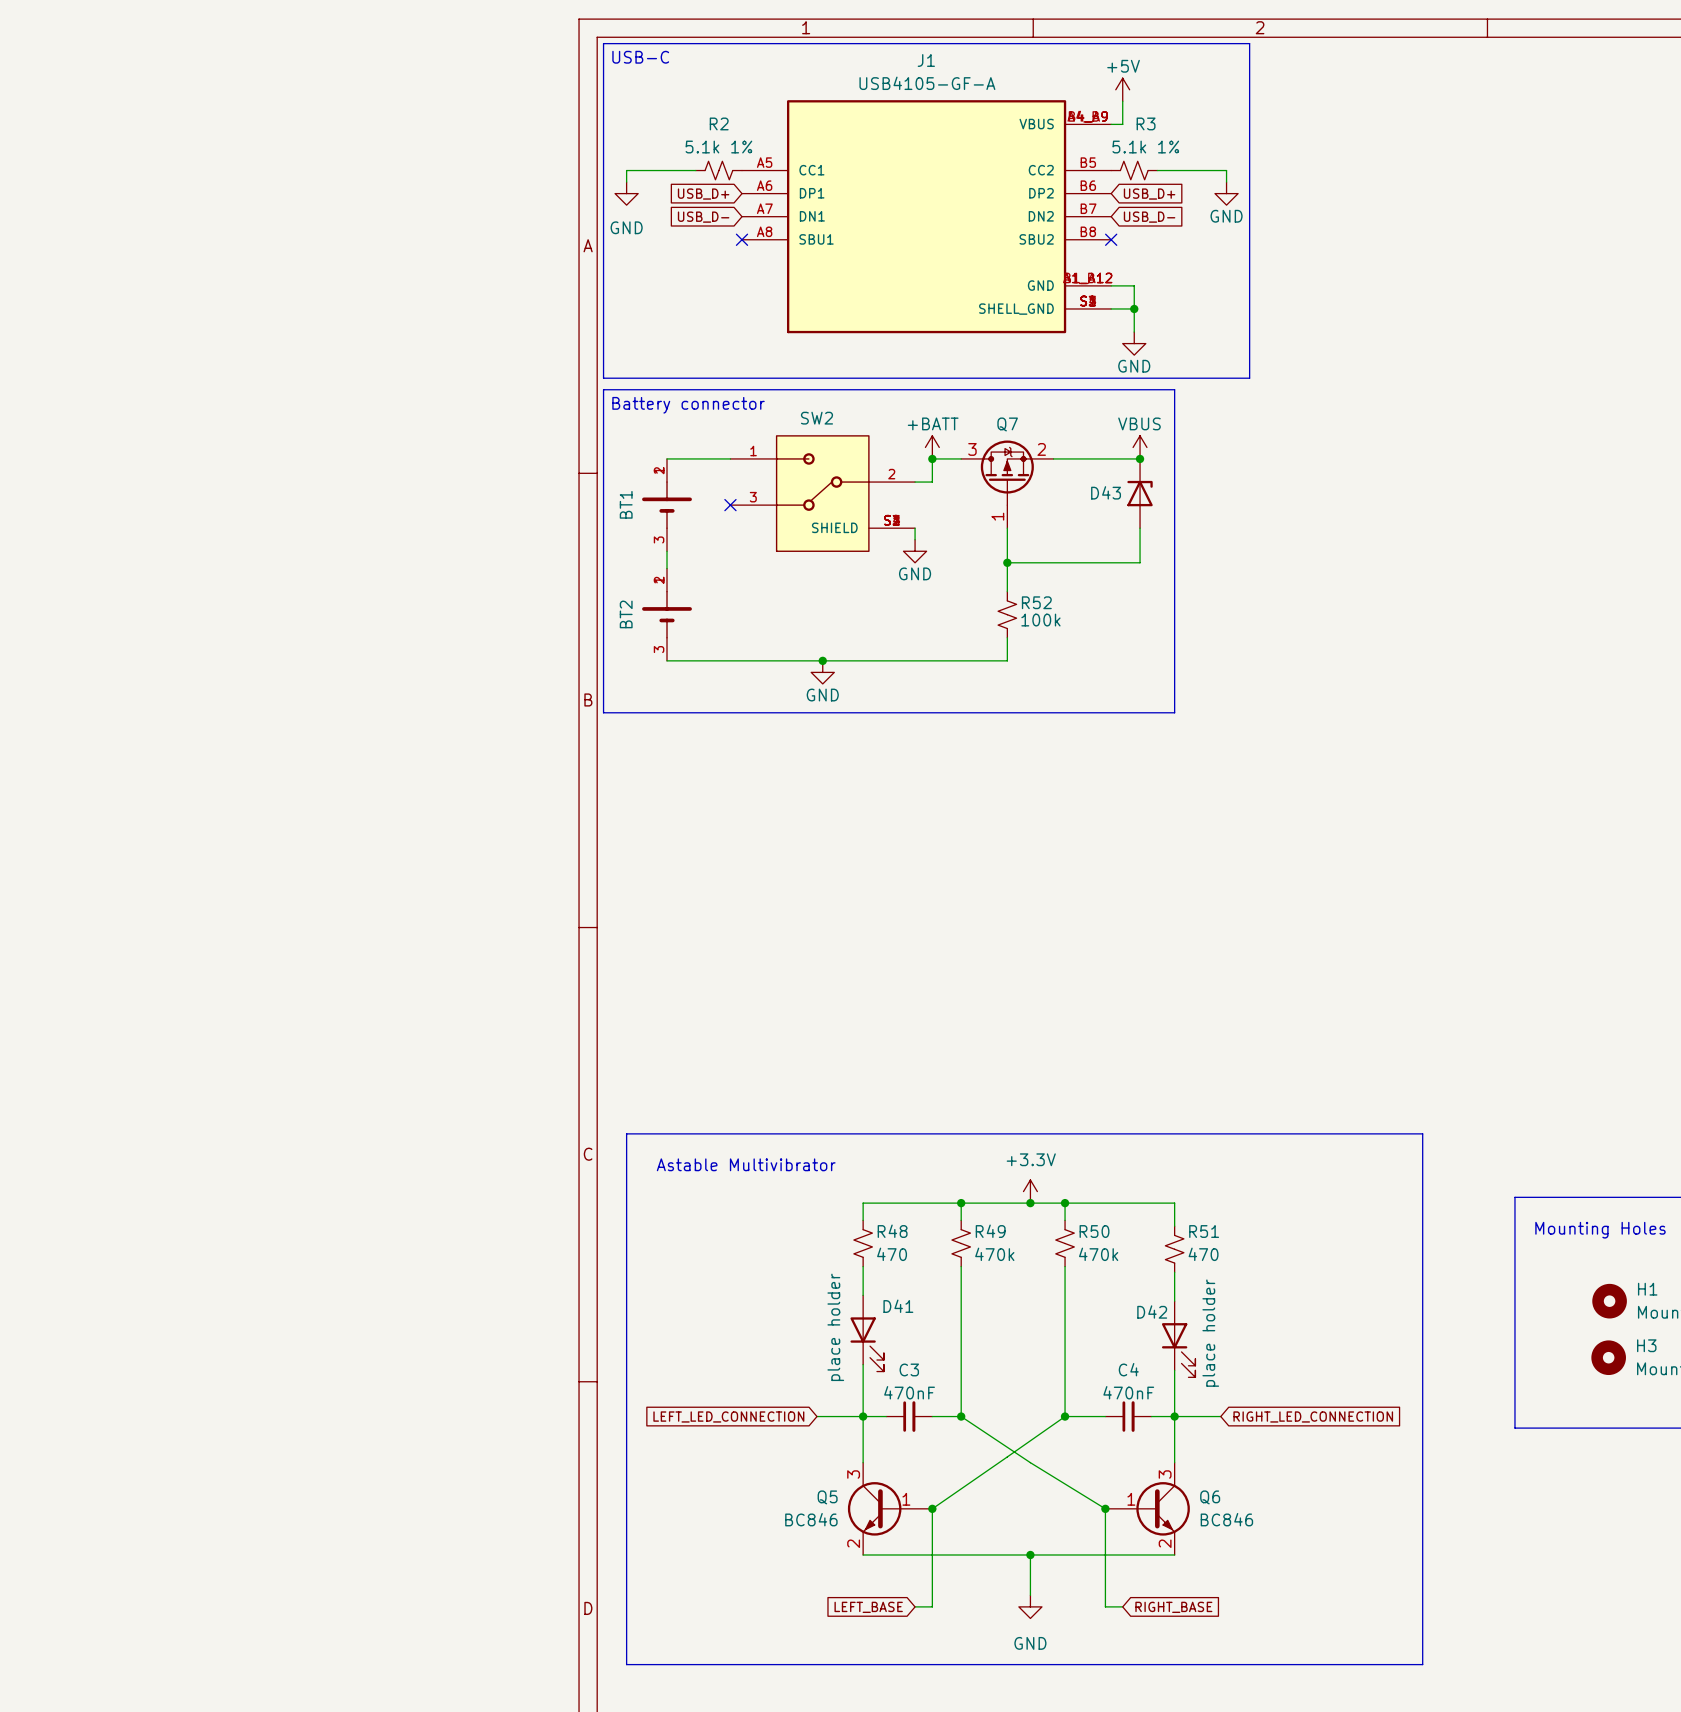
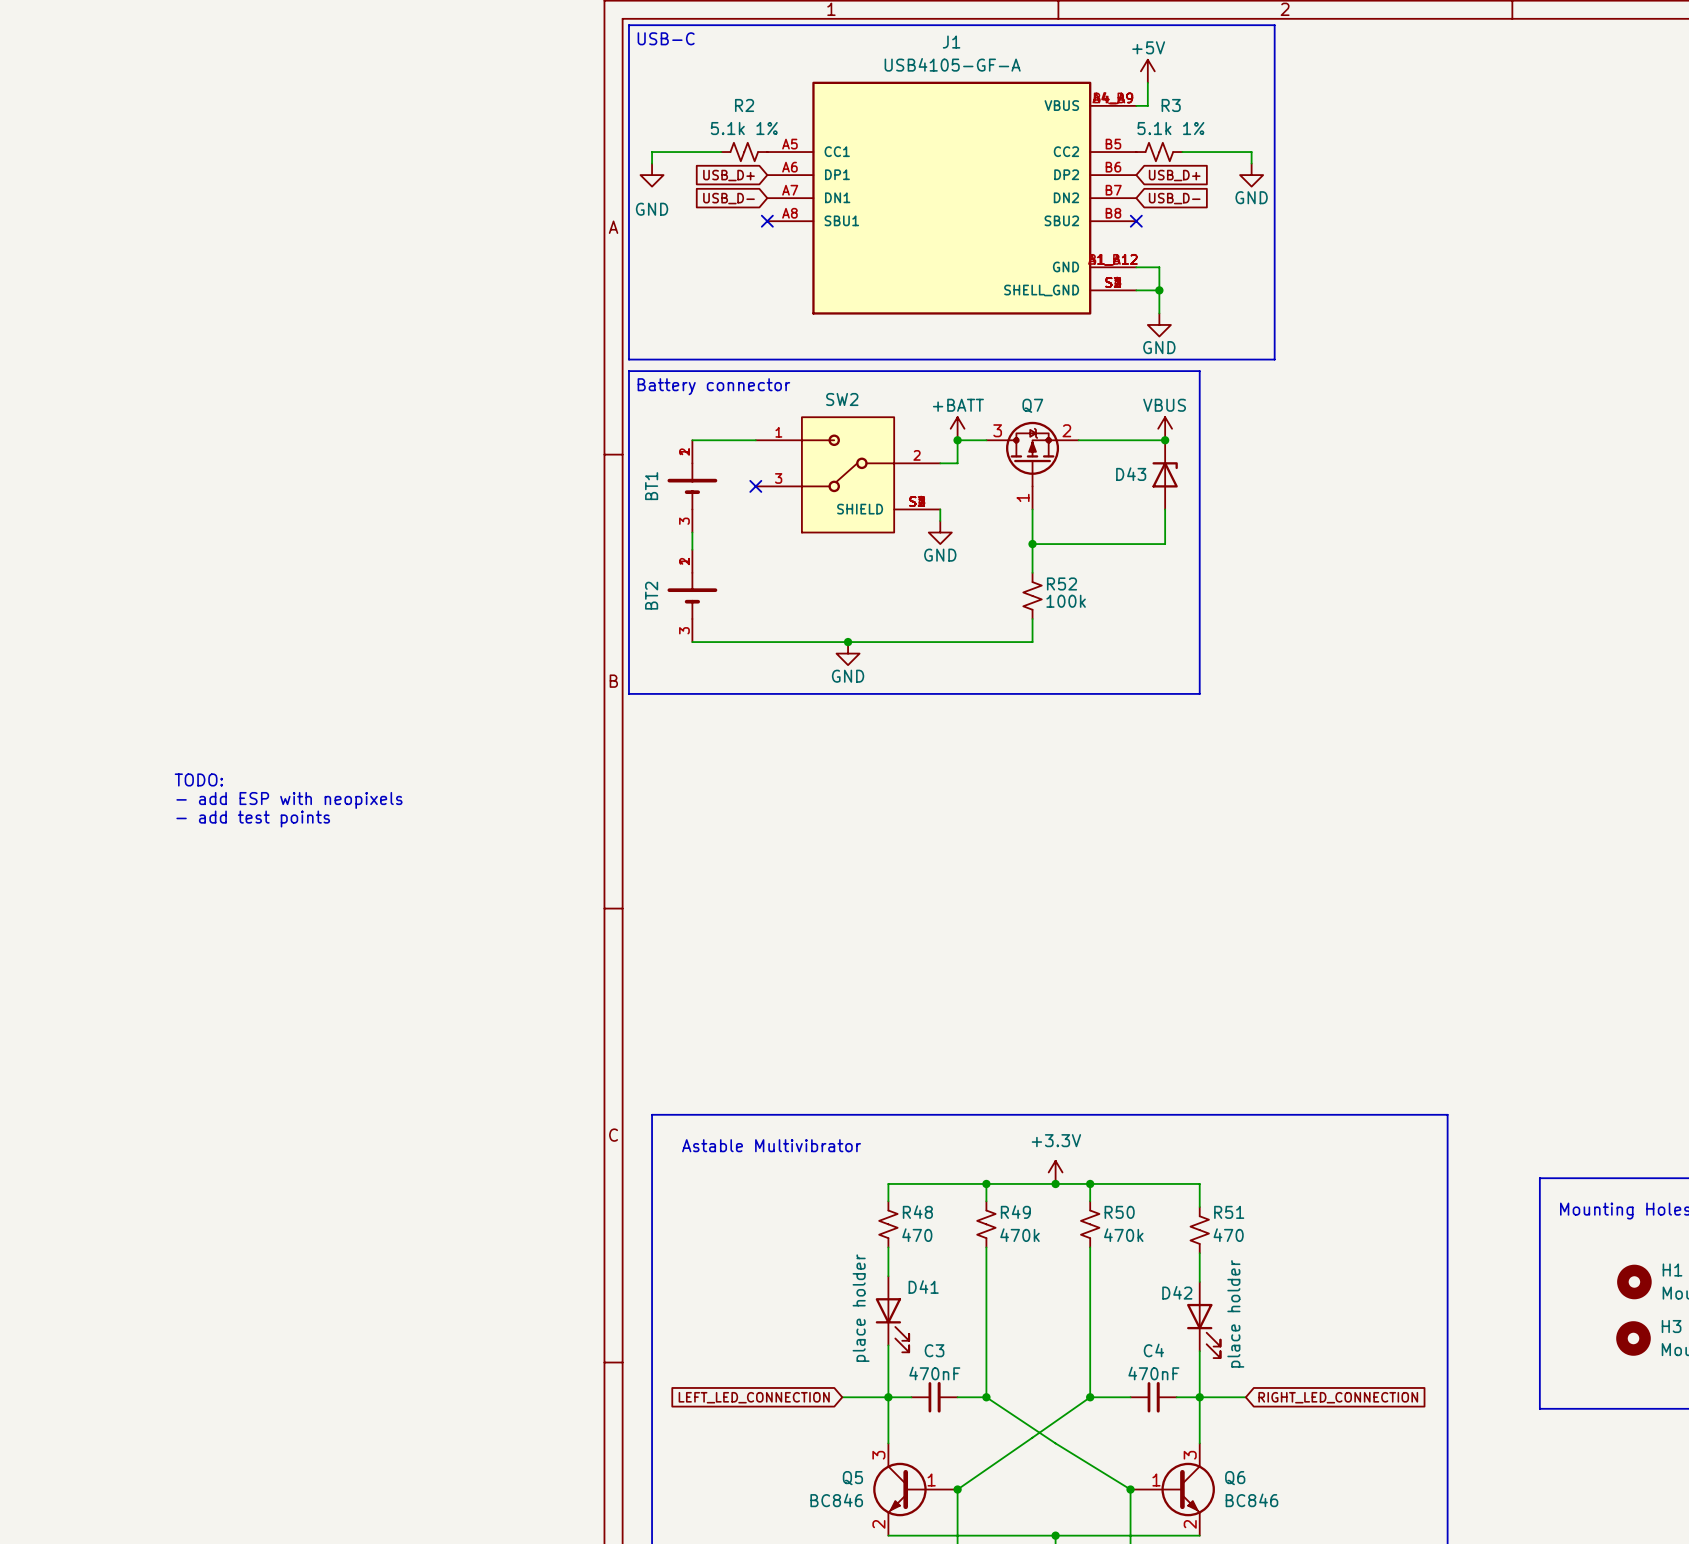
text: none -> TODO: (198, 779)
text: none -> - add ESP with neopixels (289, 800)
text: none -> - add test points (253, 819)

